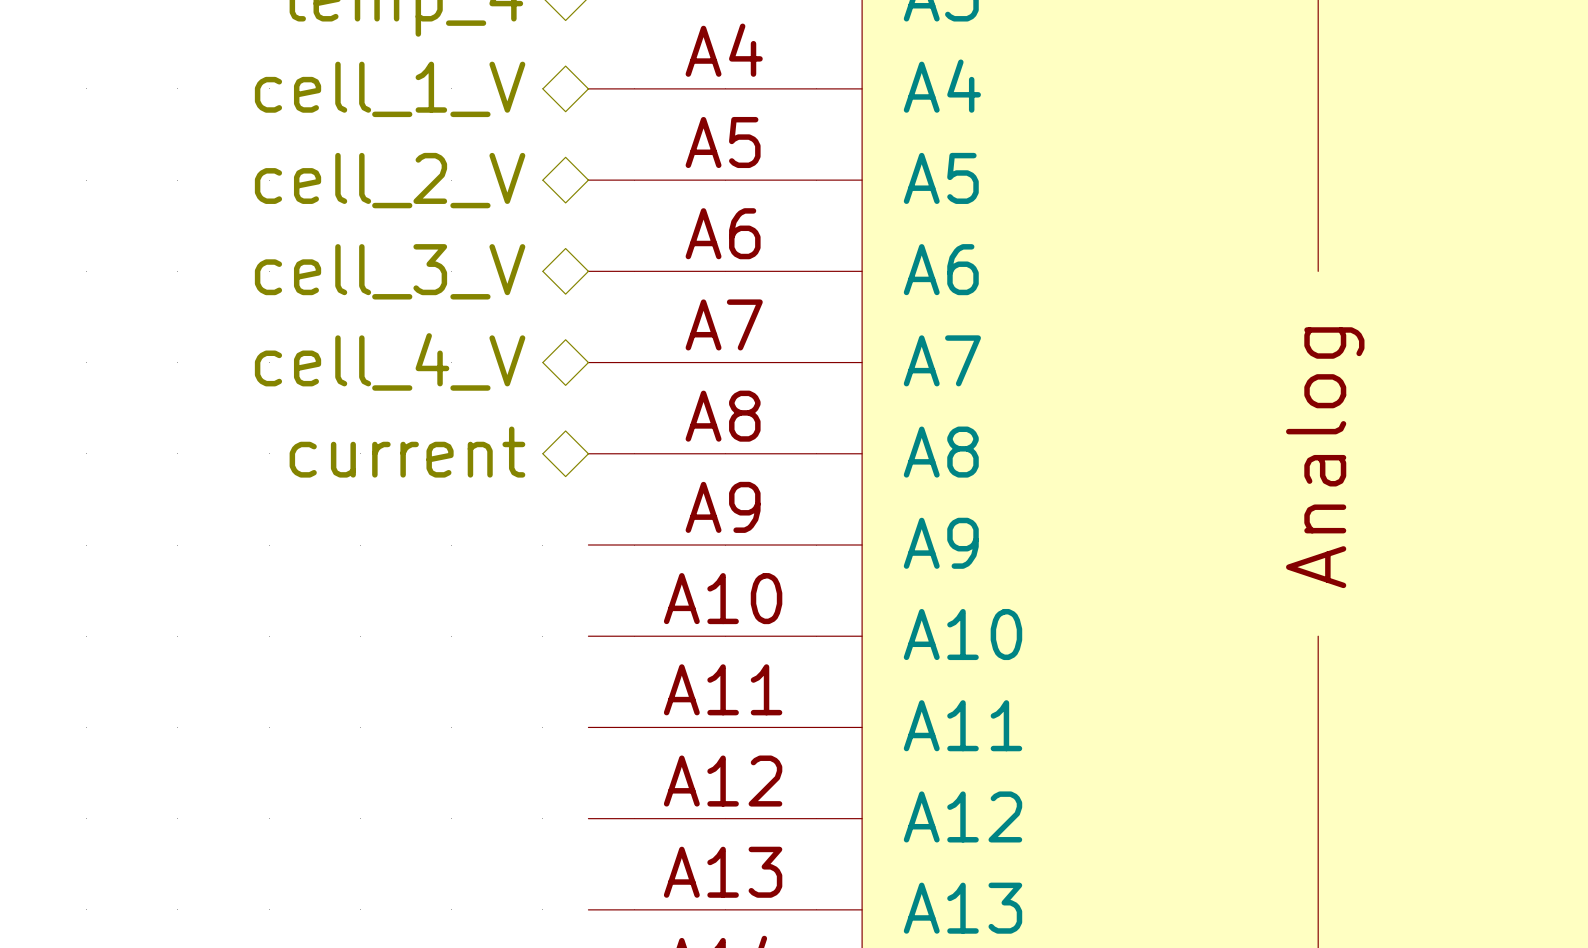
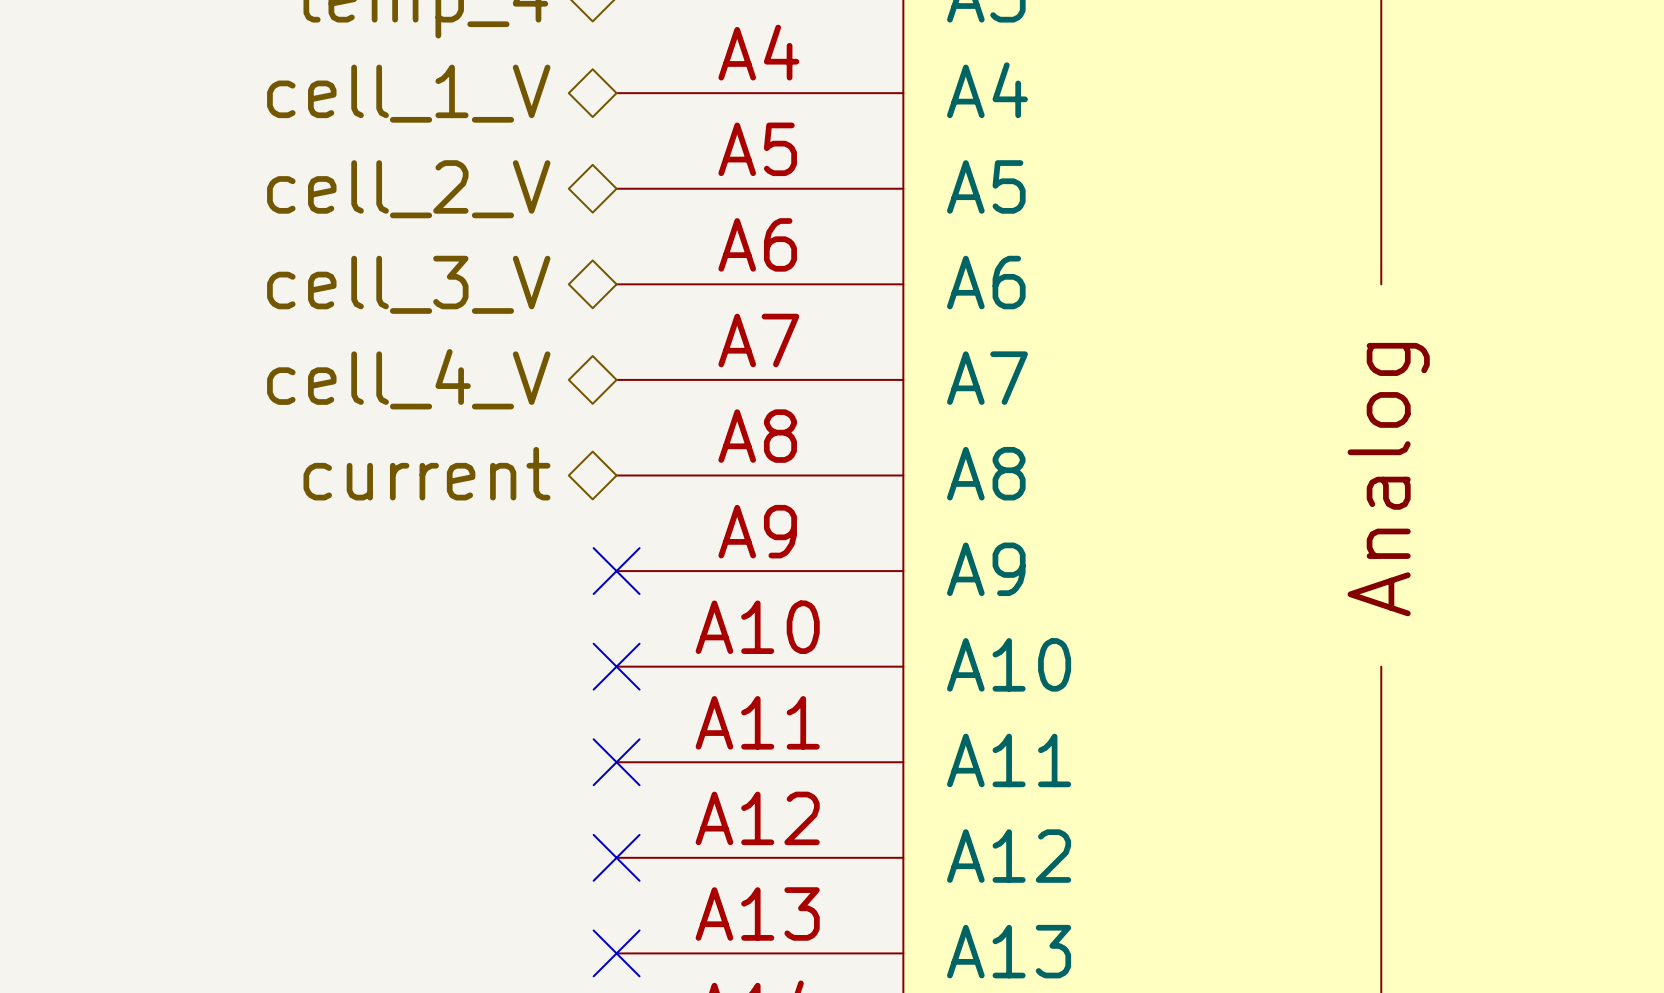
no-connect mark: none -> (616, 571)
no-connect mark: none -> (616, 666)
no-connect mark: none -> (616, 762)
no-connect mark: none -> (616, 857)
no-connect mark: none -> (616, 953)

